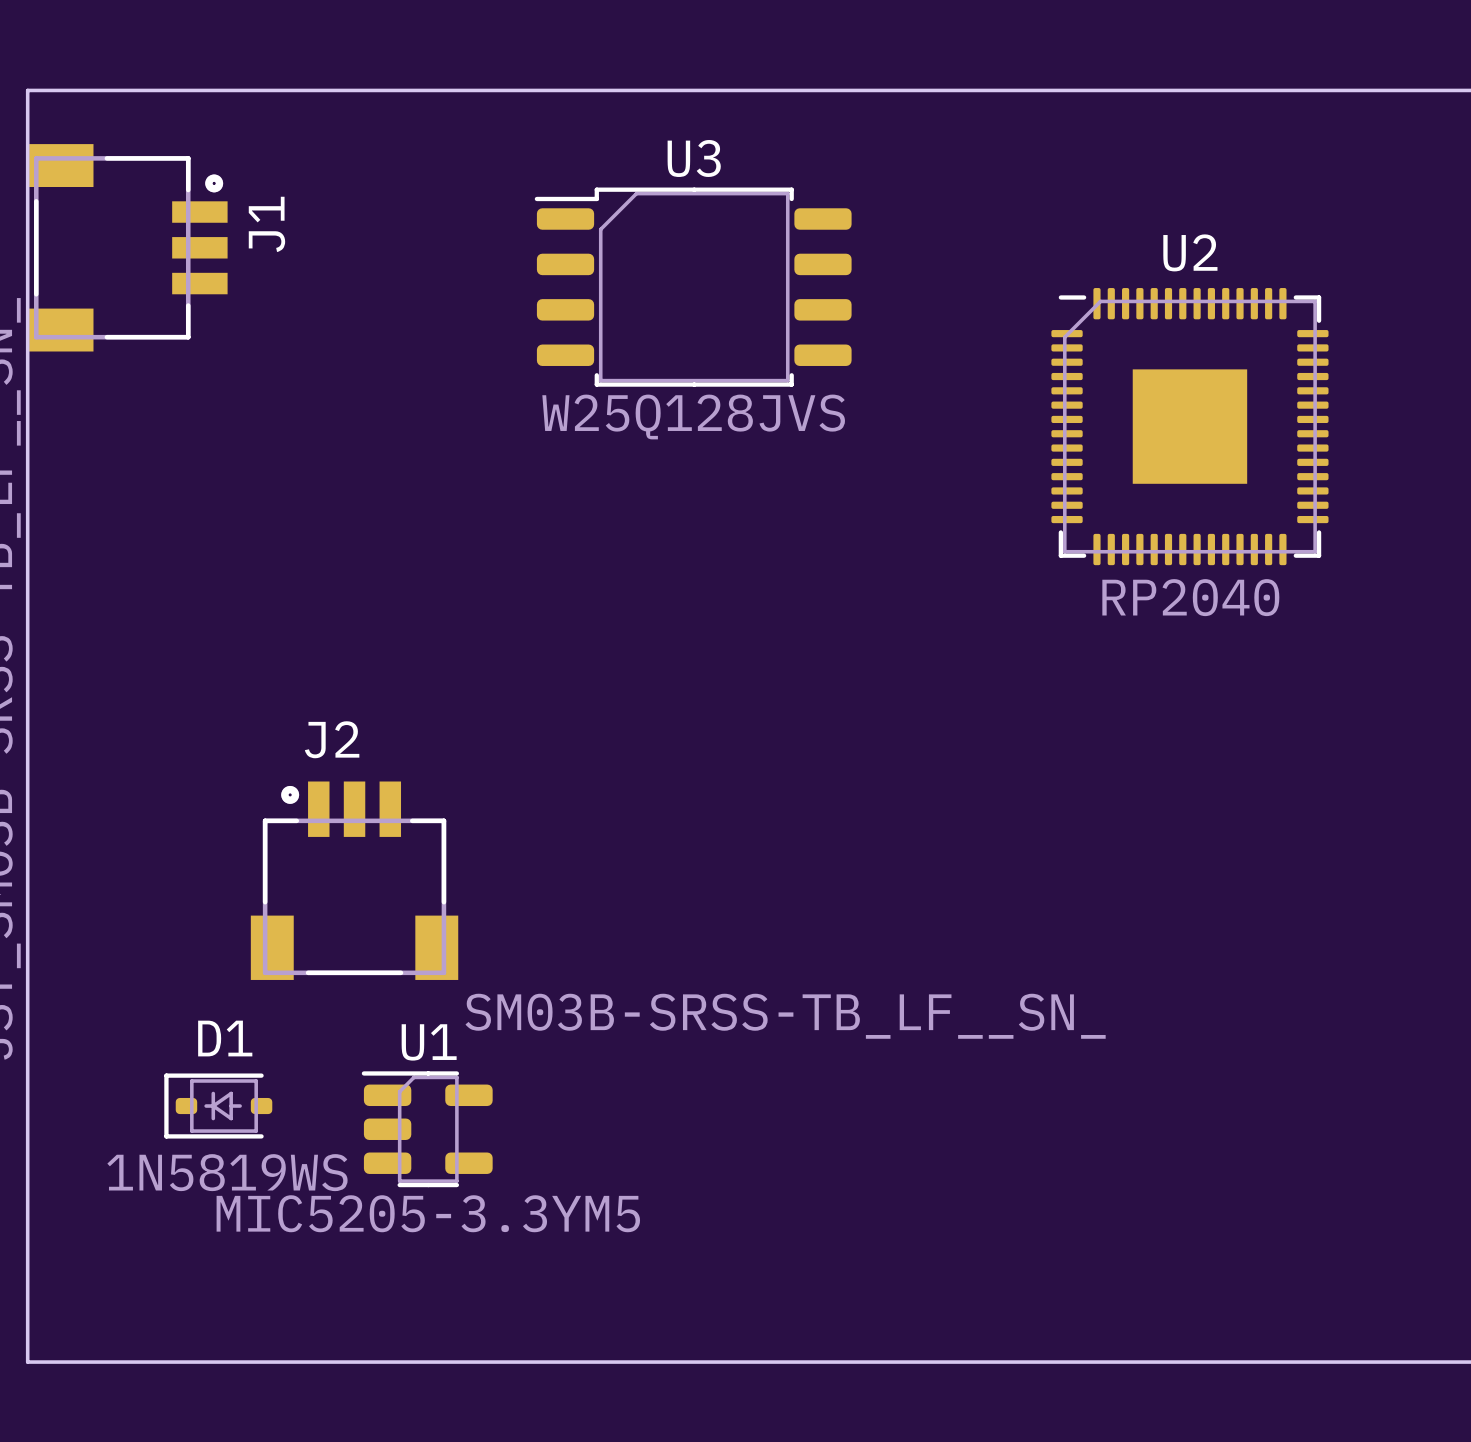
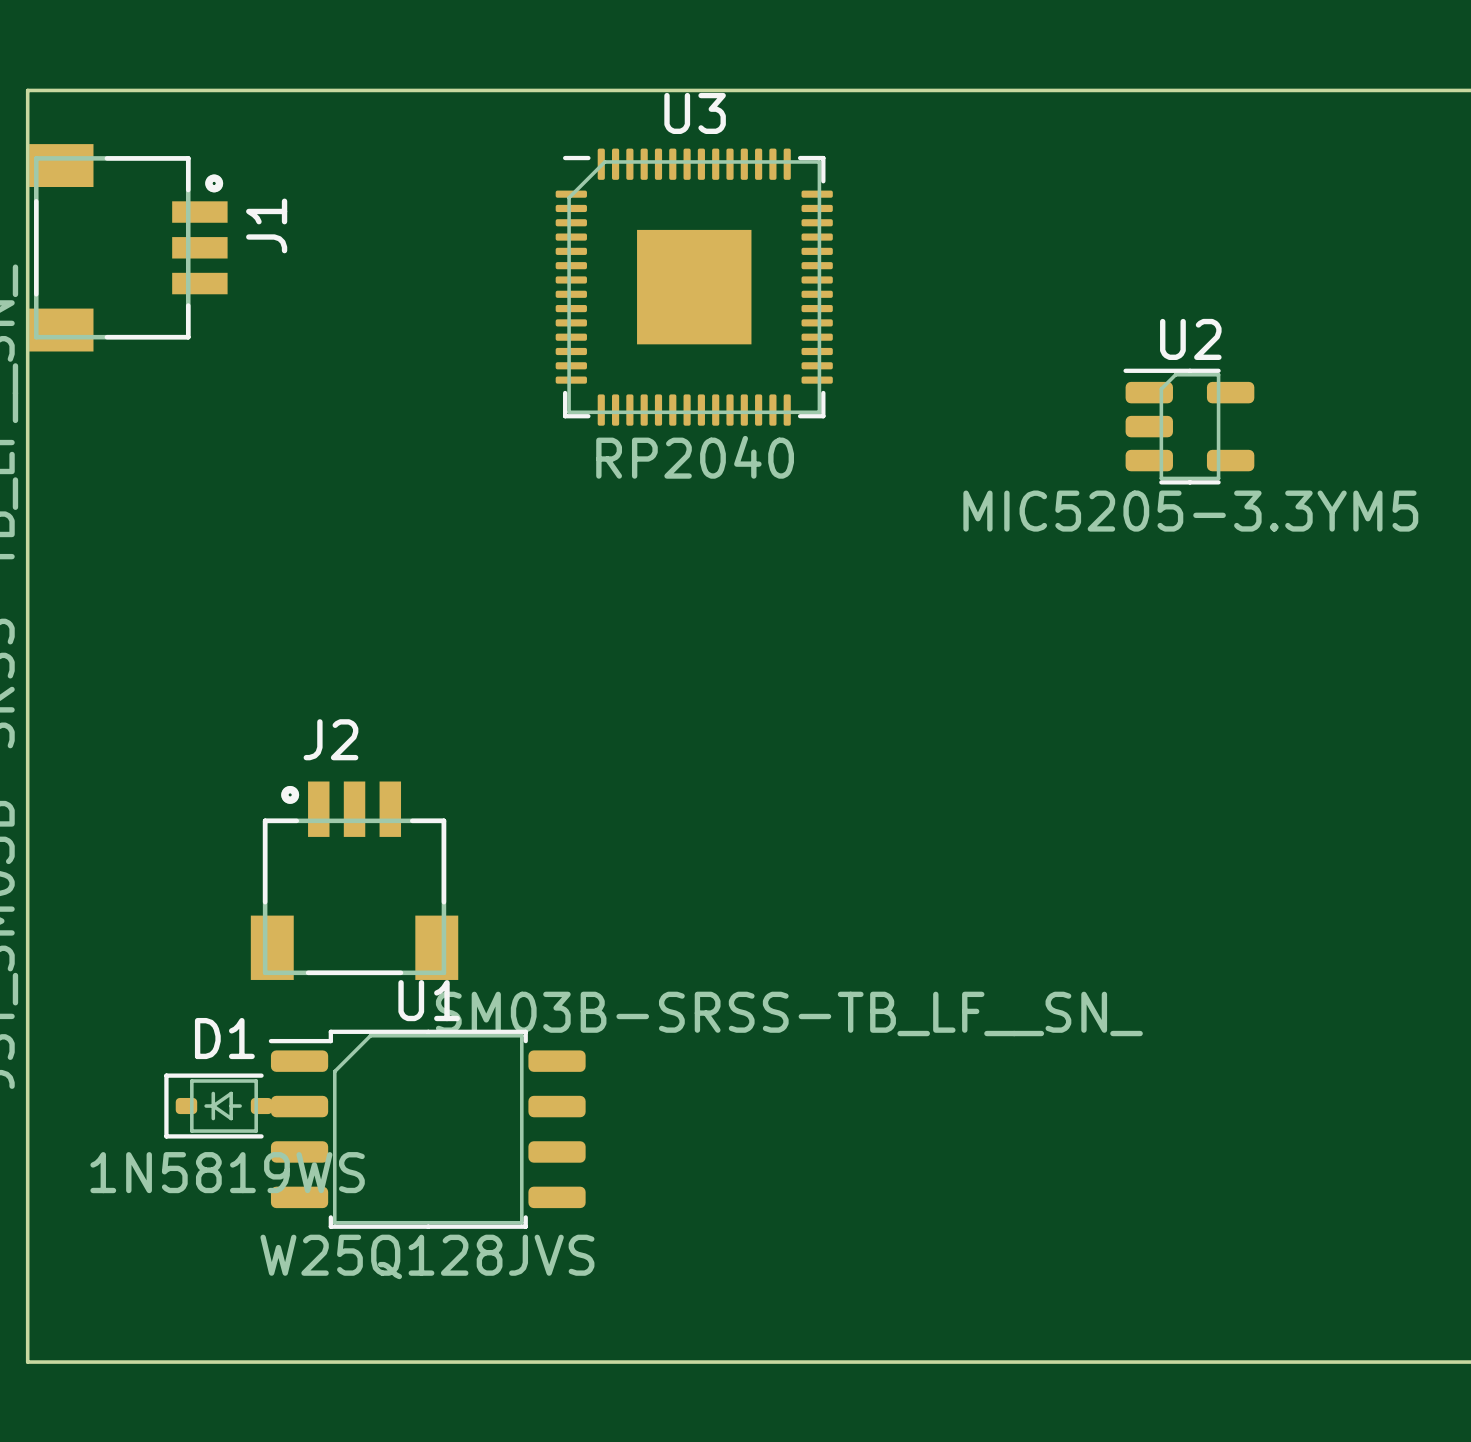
U3 footprint: [534, 187, 852, 387] -> [555, 148, 833, 426]
U2 name position: U2 (1190, 252) -> U2 (1190, 339)
U2 footprint: [1051, 288, 1329, 566] -> [1123, 368, 1255, 485]
U3 value: W25Q128JVS (693, 416) -> RP2040 (695, 457)
U2 value: RP2040 (1190, 597) -> MIC5205-3.3YM5 (1190, 511)
U1 footprint: [361, 1071, 493, 1188] -> [268, 1029, 586, 1229]
U1 value: MIC5205-3.3YM5 (428, 1213) -> W25Q128JVS (427, 1256)

